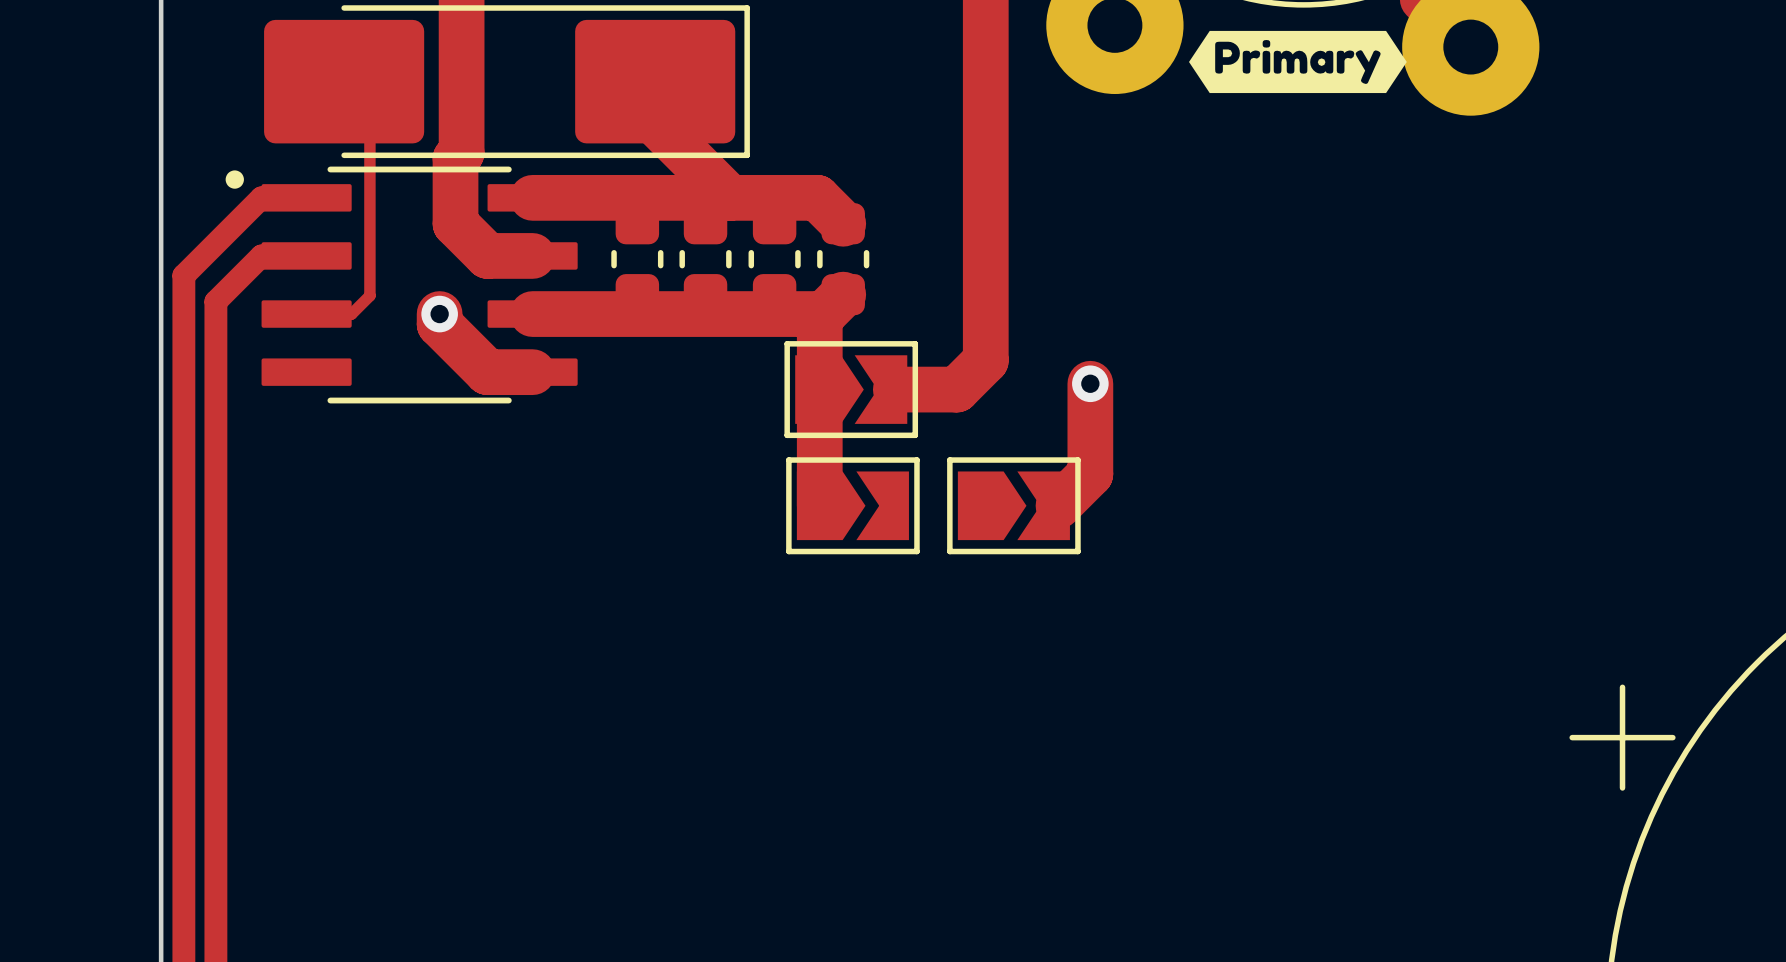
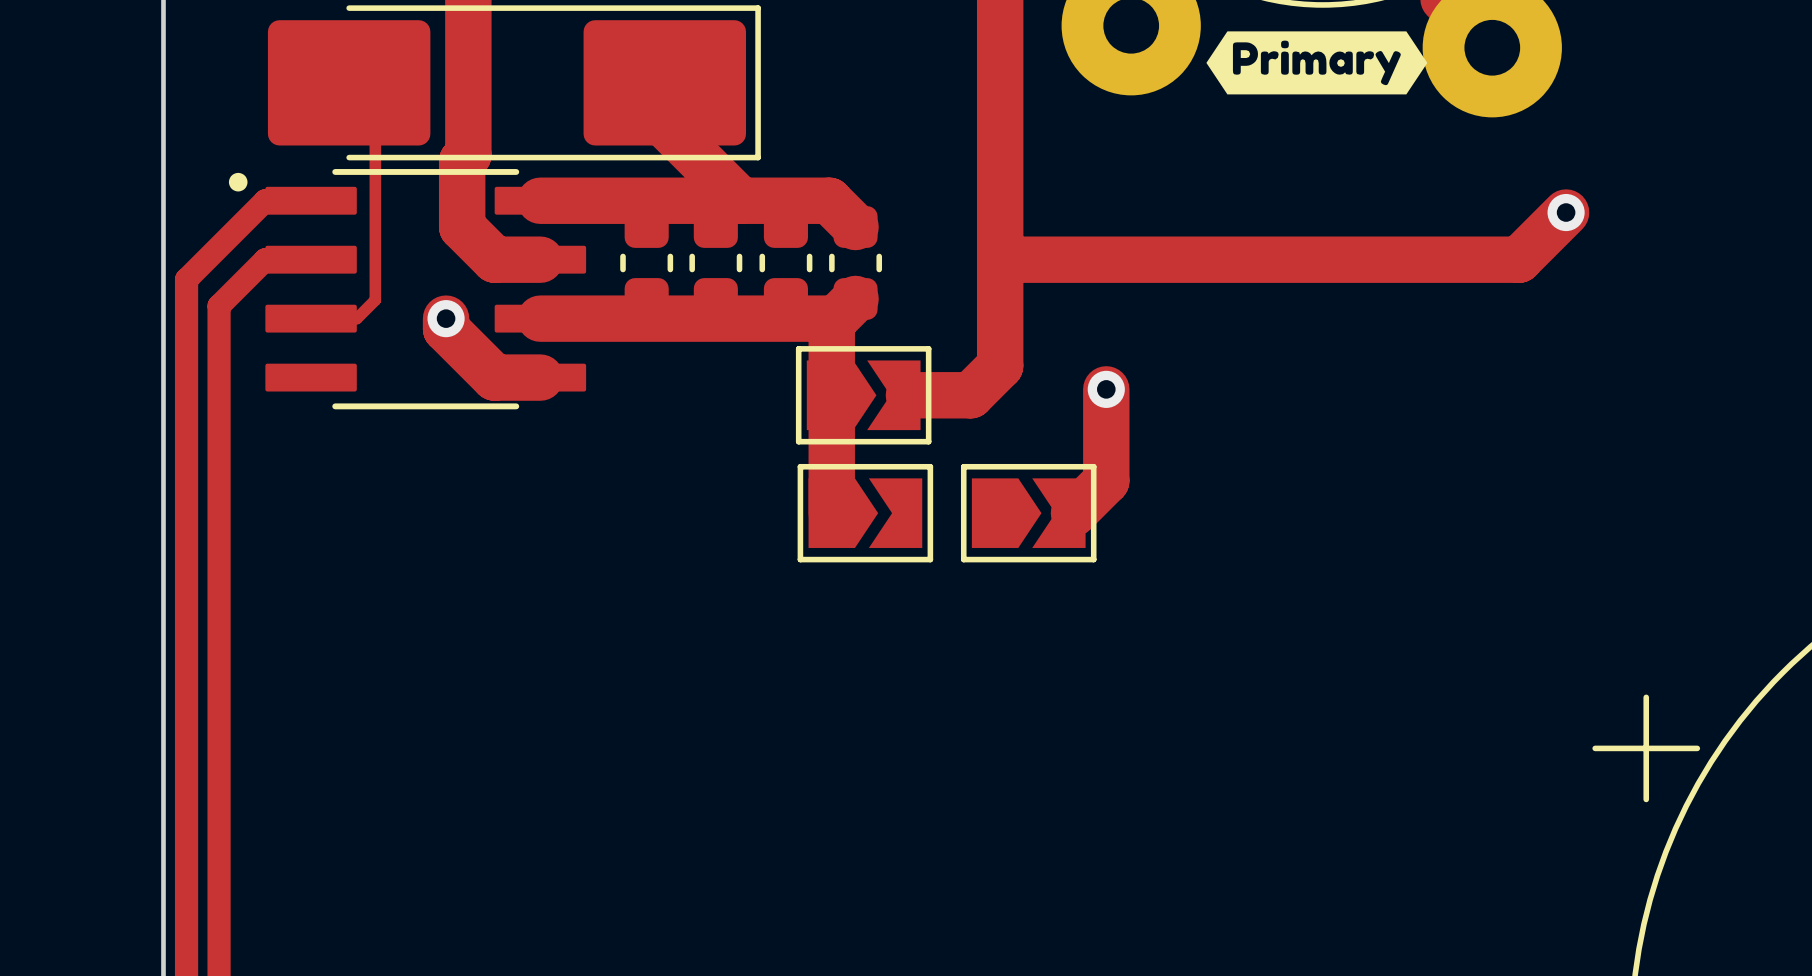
track: none -> (1566, 212) (1518, 259) (1000, 259)
via: none -> (1566, 212)

